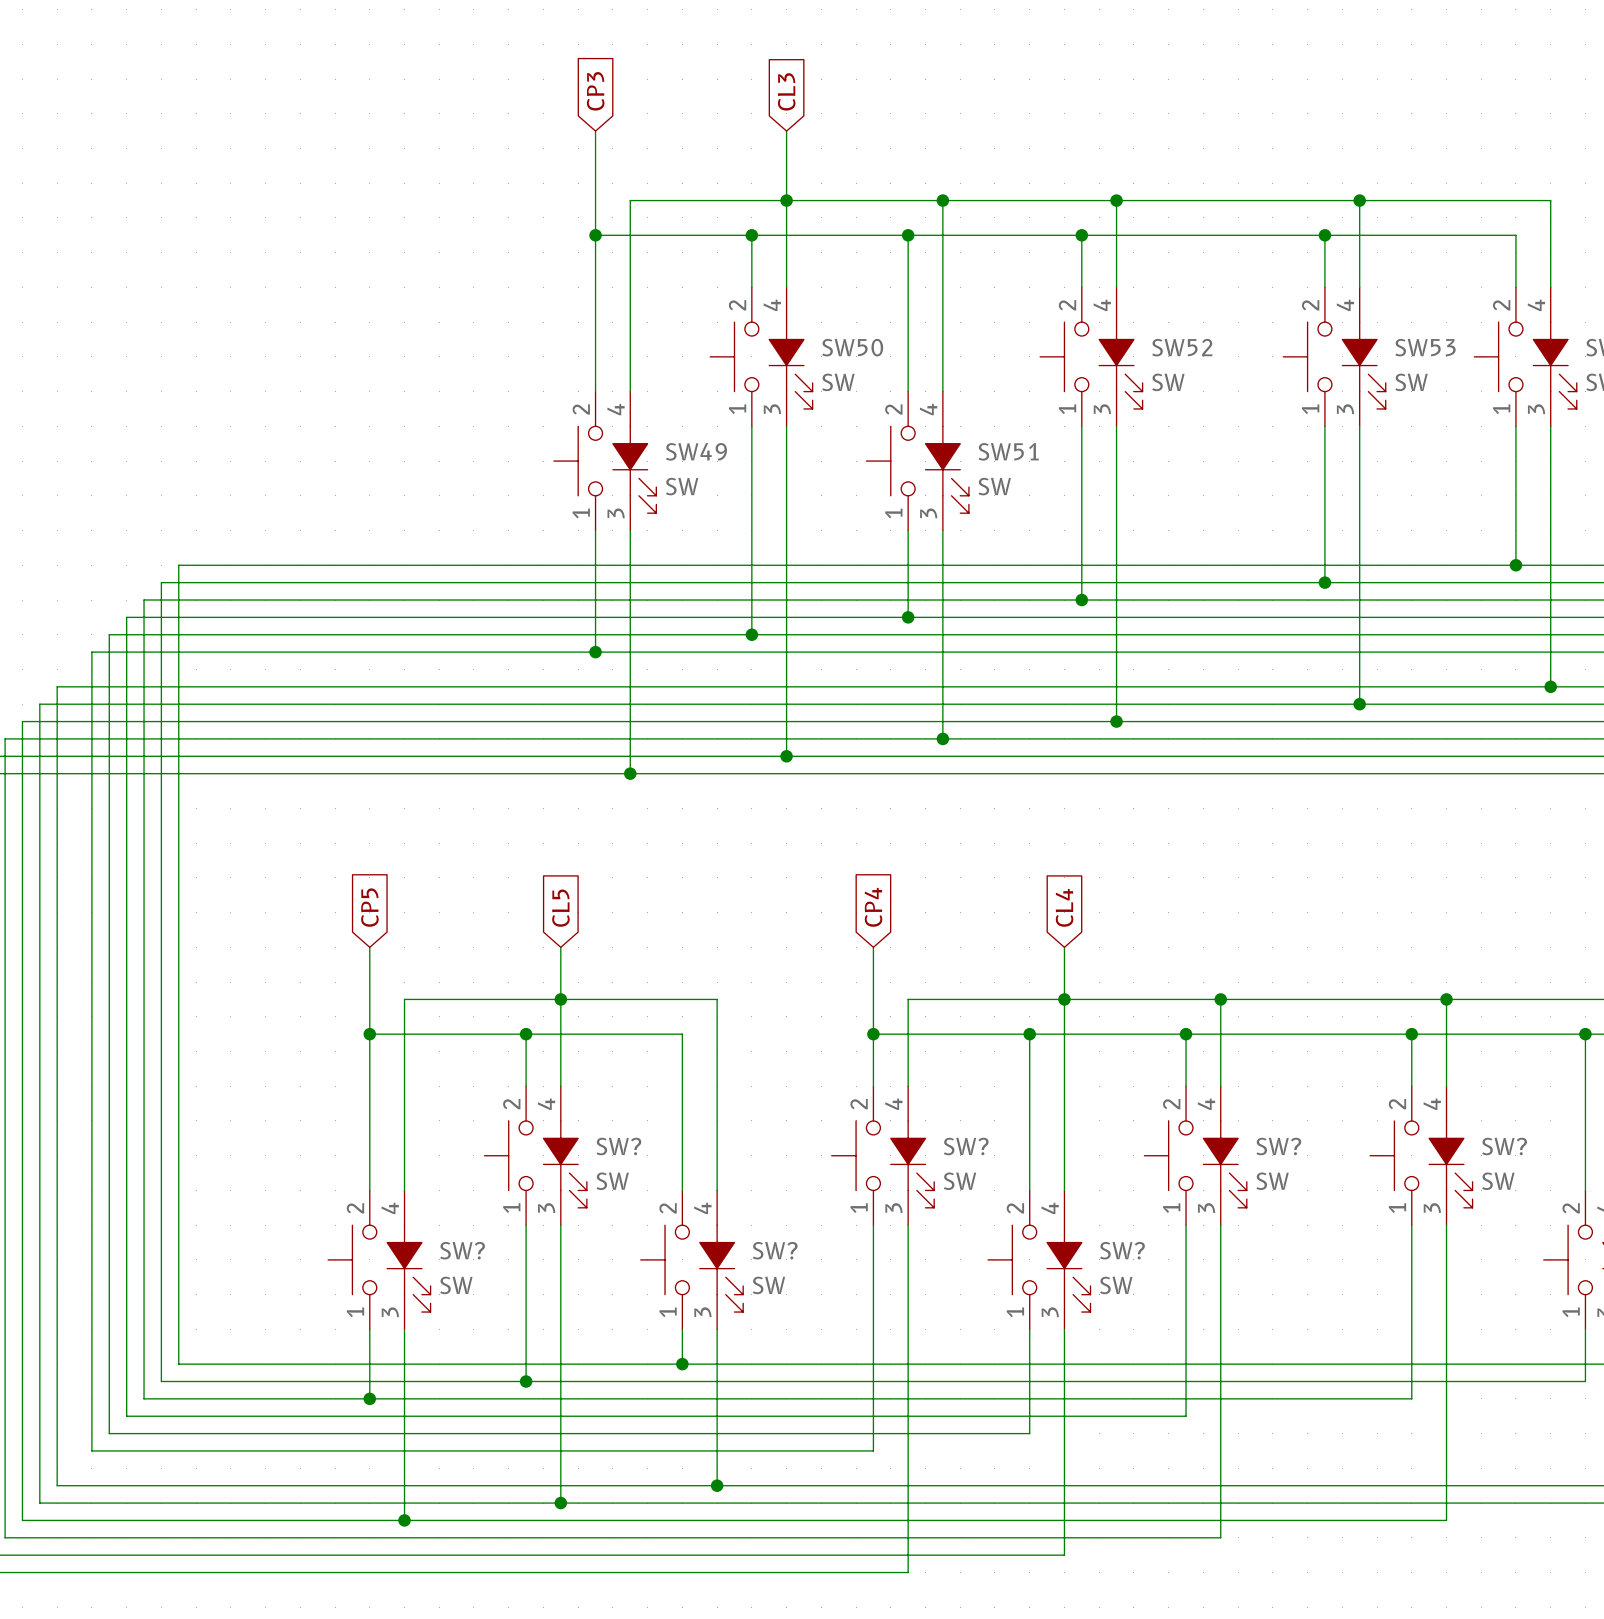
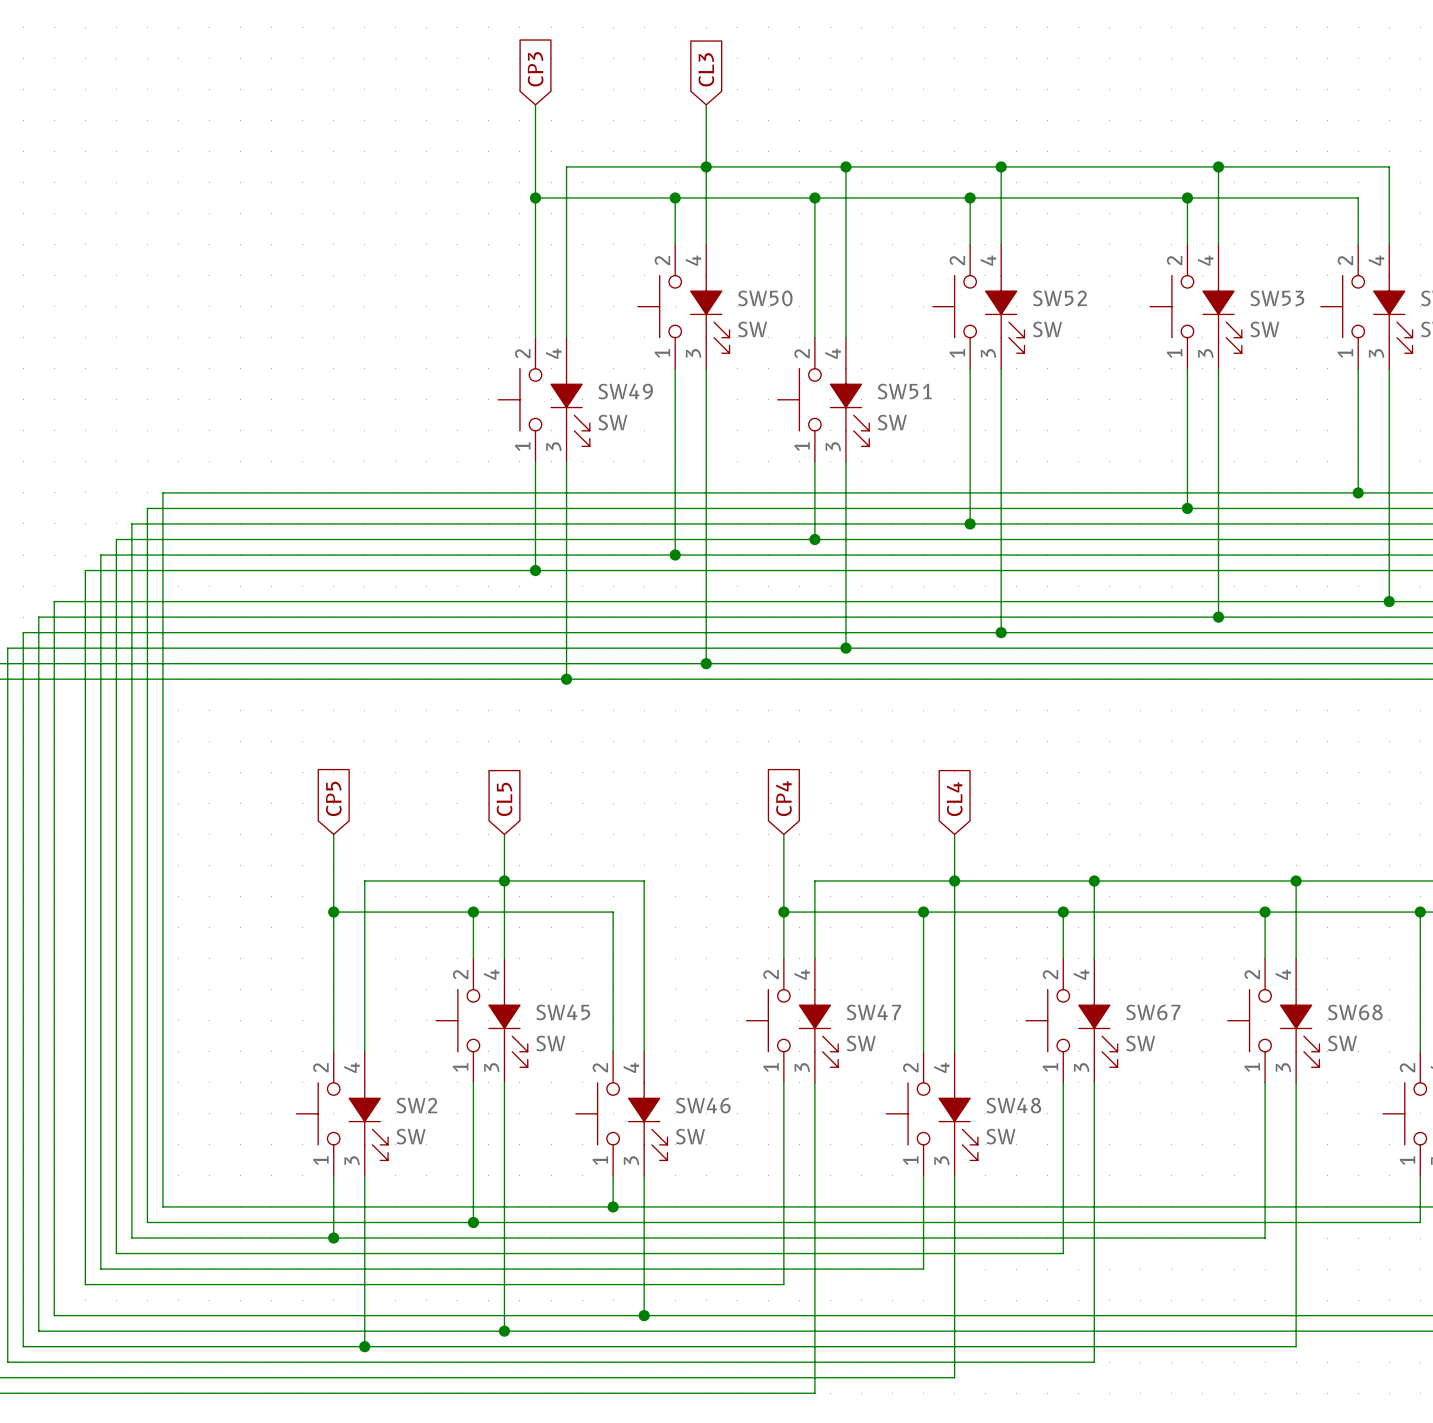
SW? name: SW? (618, 1146) -> SW45 (563, 1012)
SW? name: SW? (966, 1146) -> SW47 (873, 1012)
SW? name: SW? (1278, 1146) -> SW67 (1153, 1012)
SW? name: SW? (1504, 1146) -> SW68 (1355, 1012)
SW? name: SW? (462, 1250) -> SW2 (416, 1105)
SW? name: SW? (775, 1250) -> SW46 (703, 1105)
SW? name: SW? (1122, 1250) -> SW48 (1013, 1105)

